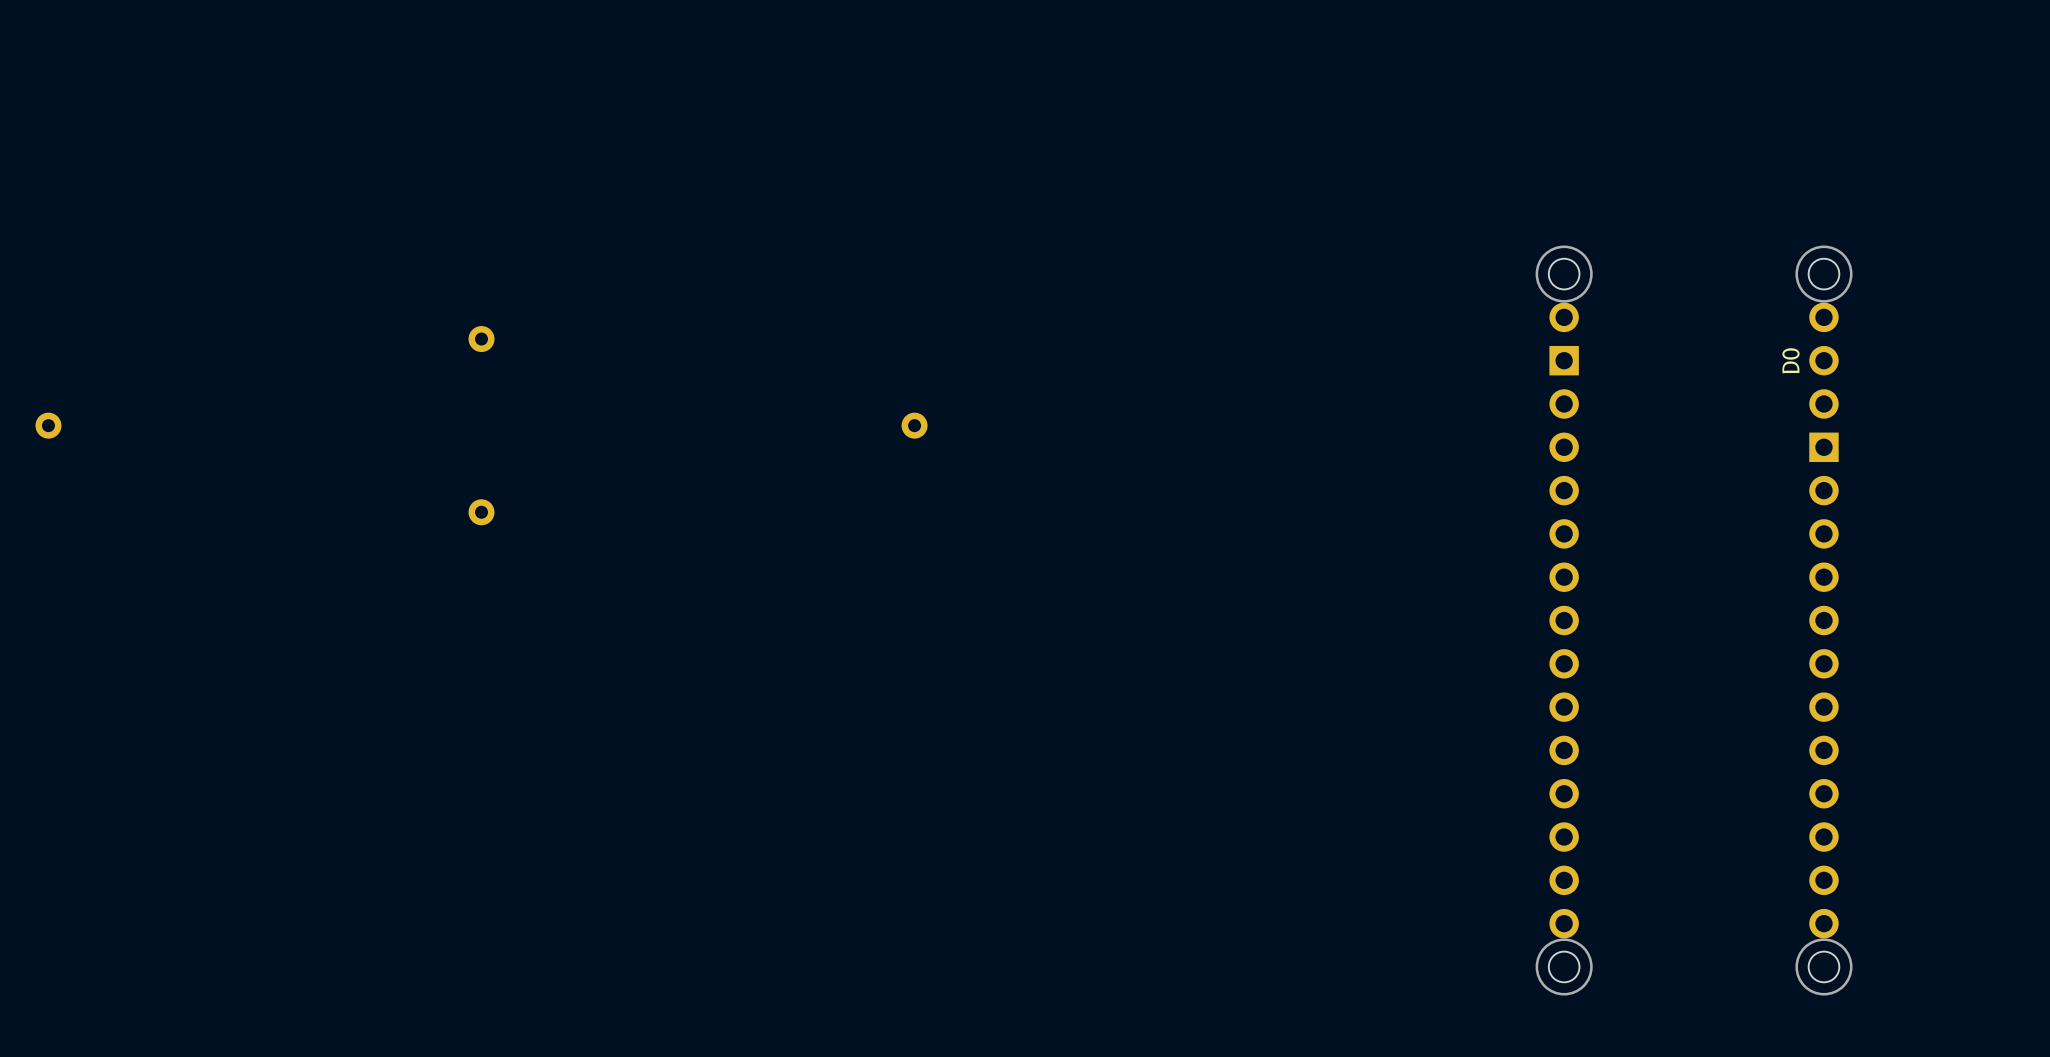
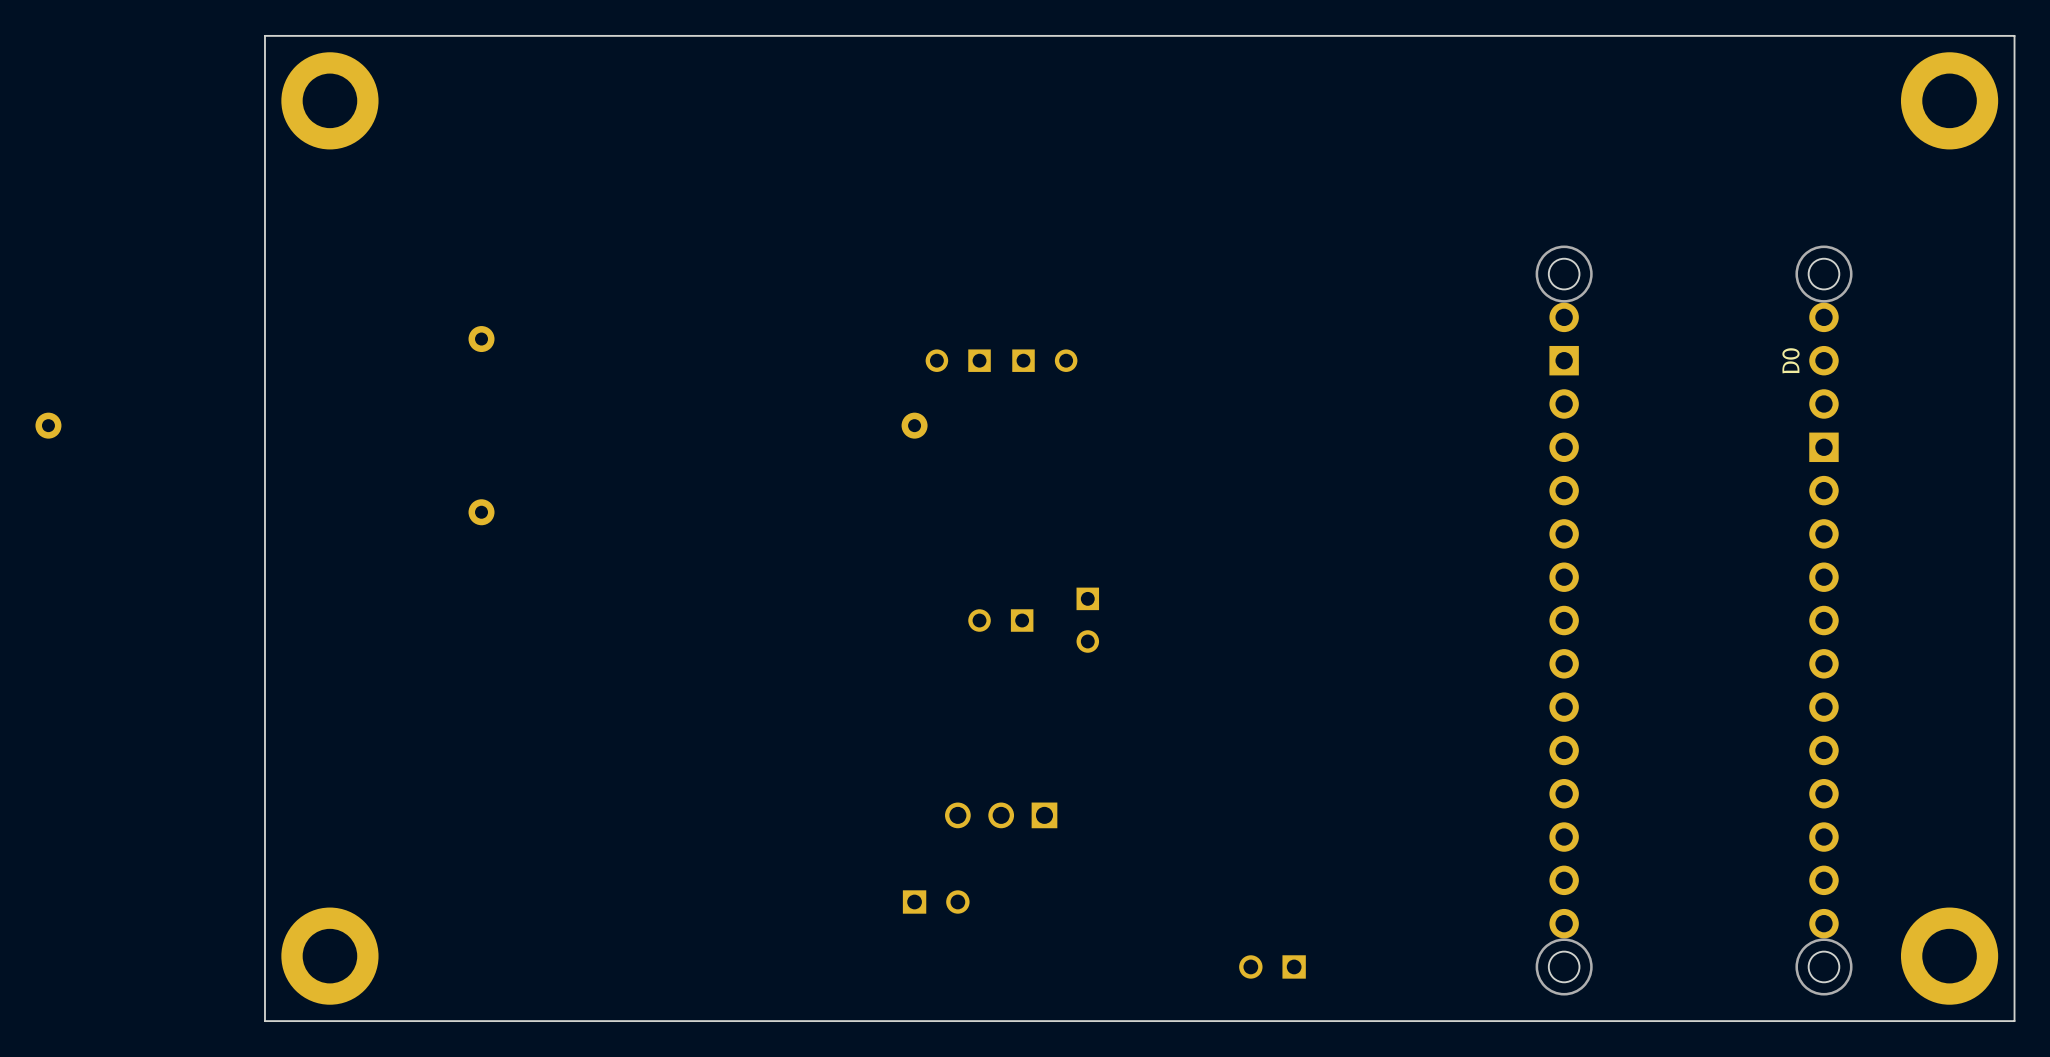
board edge: none -> (2014, 35) (264, 35) (264, 1021) (2014, 1021) (2014, 35)
part: none -> (329, 100)
part: none -> (1949, 100)
part: none -> (958, 360)
part: none -> (1044, 360)
part: none -> (1000, 620)
part: none -> (1087, 620)
part: none -> (1001, 815)
part: none -> (936, 902)
part: none -> (329, 956)
part: none -> (1949, 956)
part: none -> (1272, 966)

